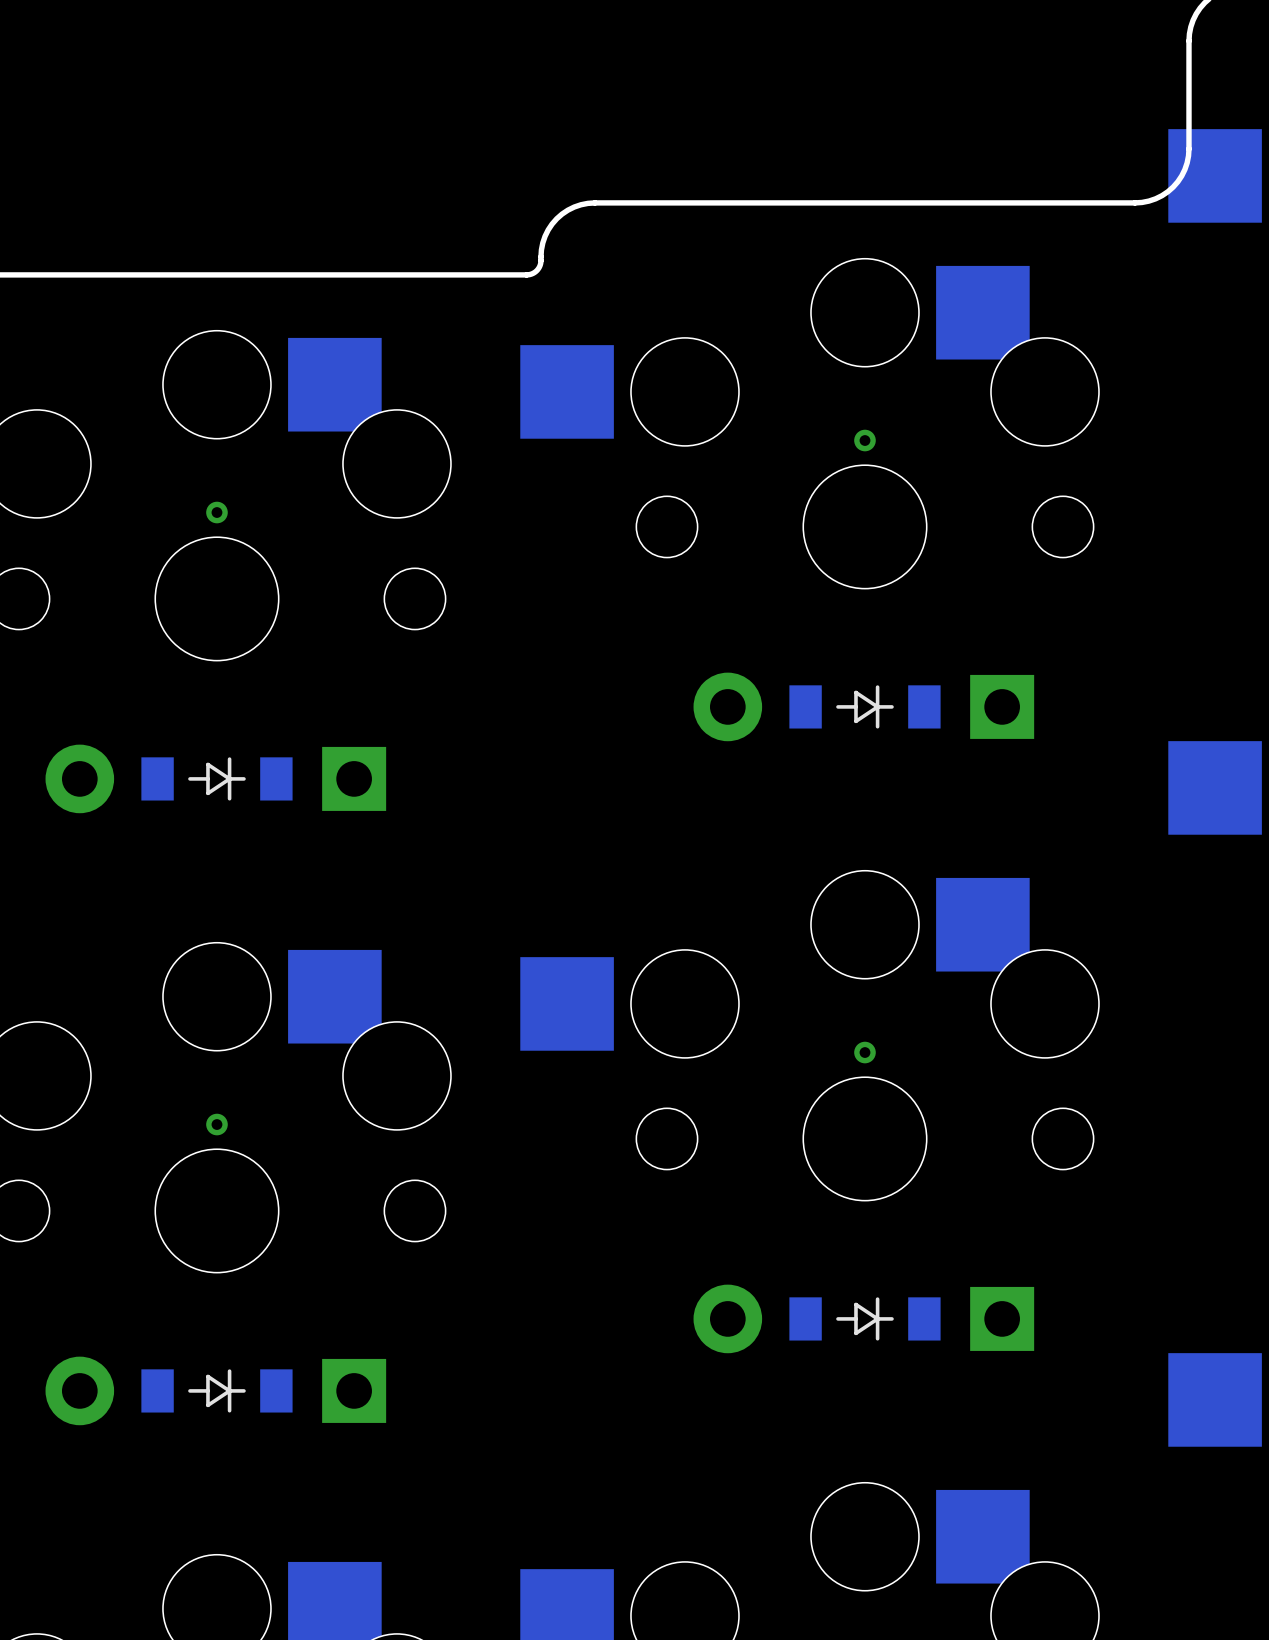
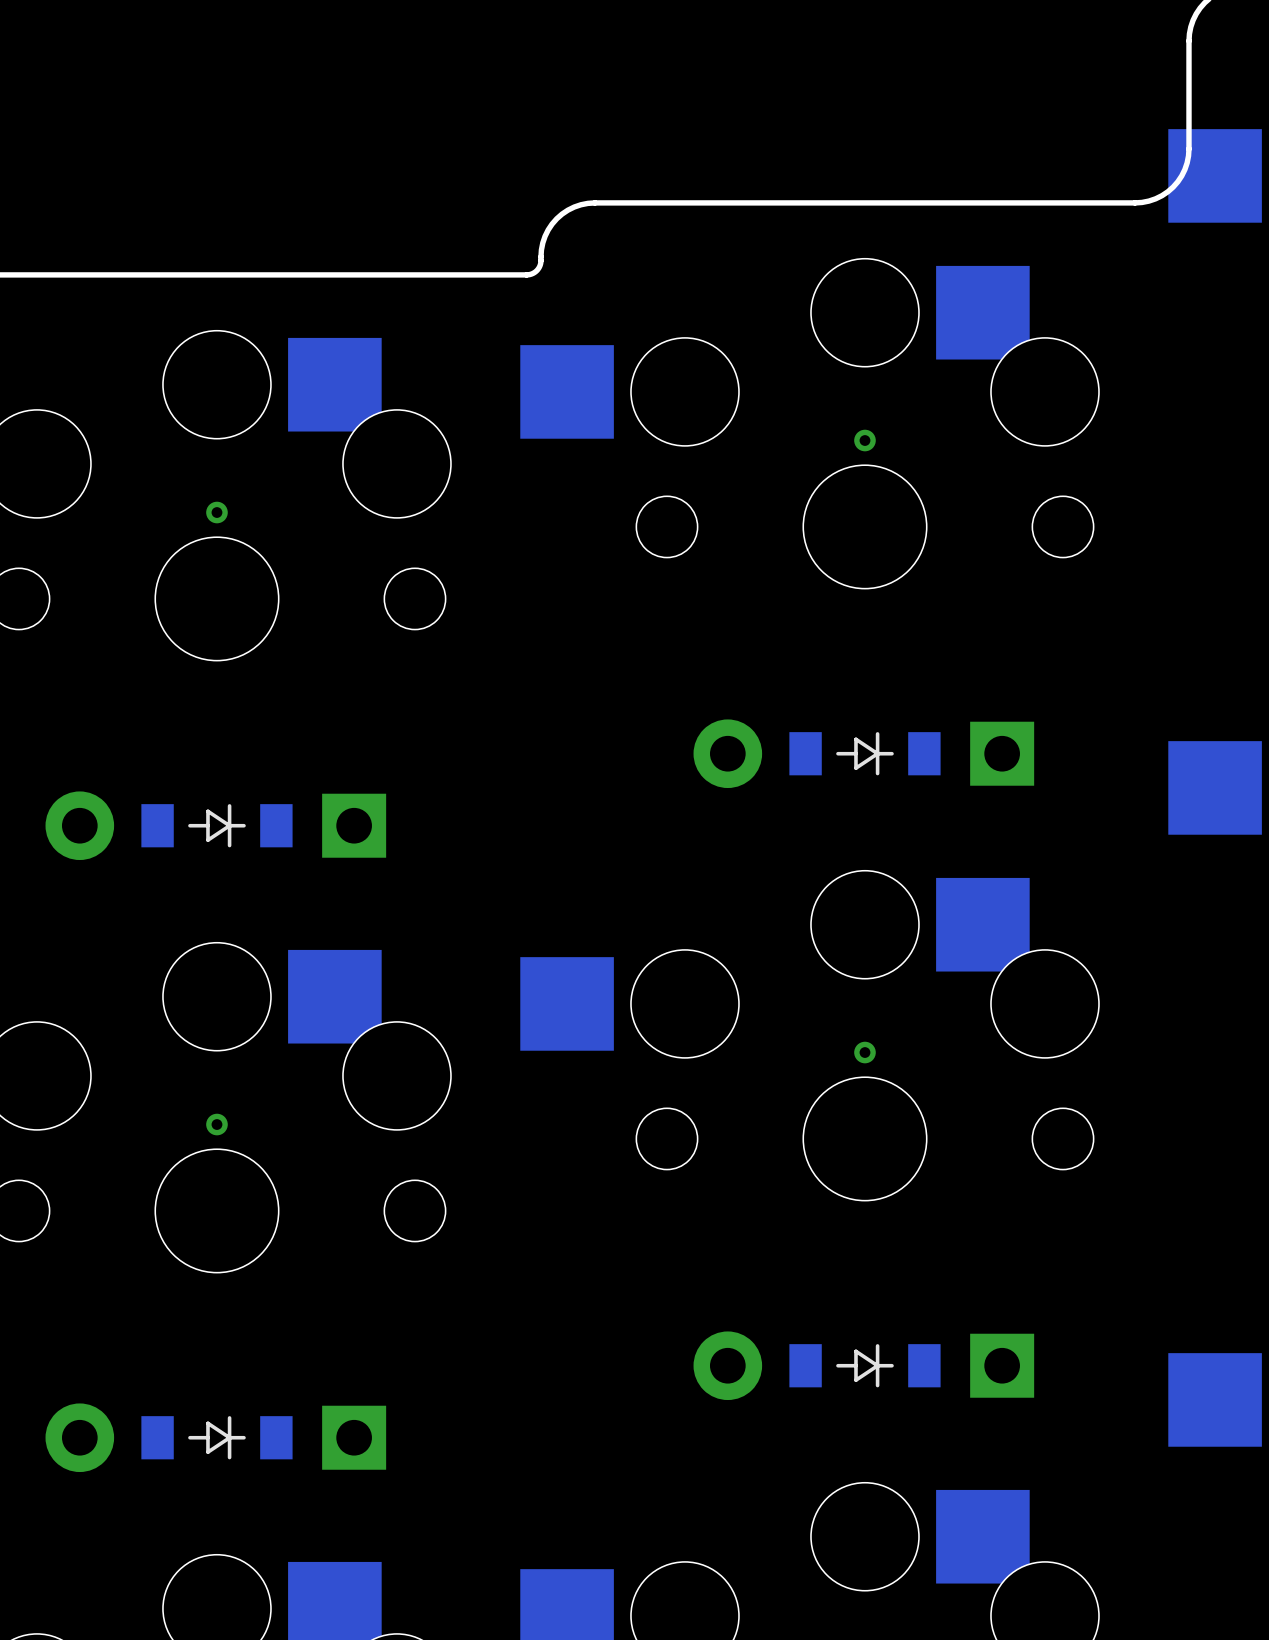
part position: (863, 706) -> (863, 753)
part position: (215, 778) -> (215, 825)
part position: (863, 1318) -> (863, 1365)
part position: (215, 1390) -> (215, 1437)

